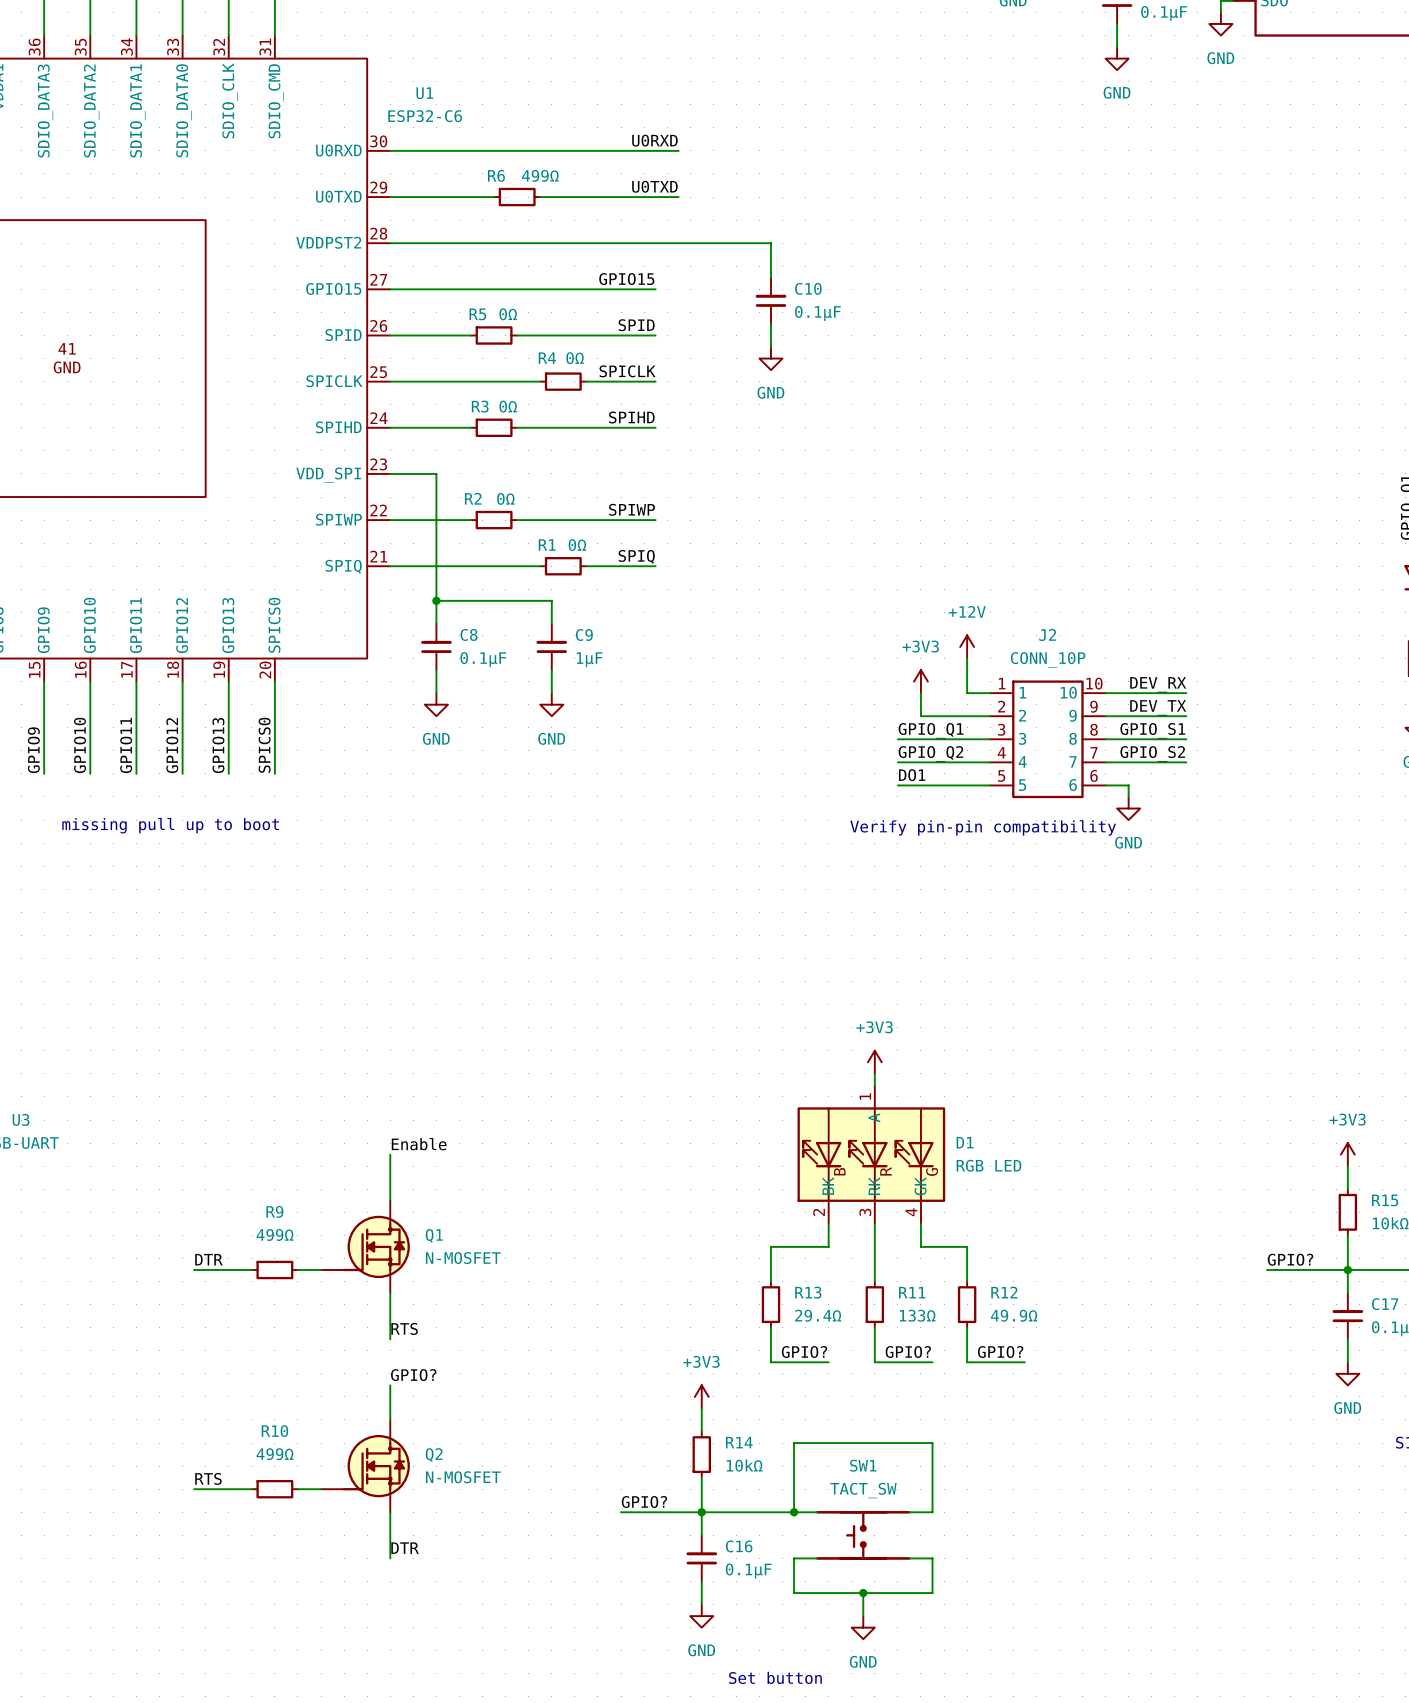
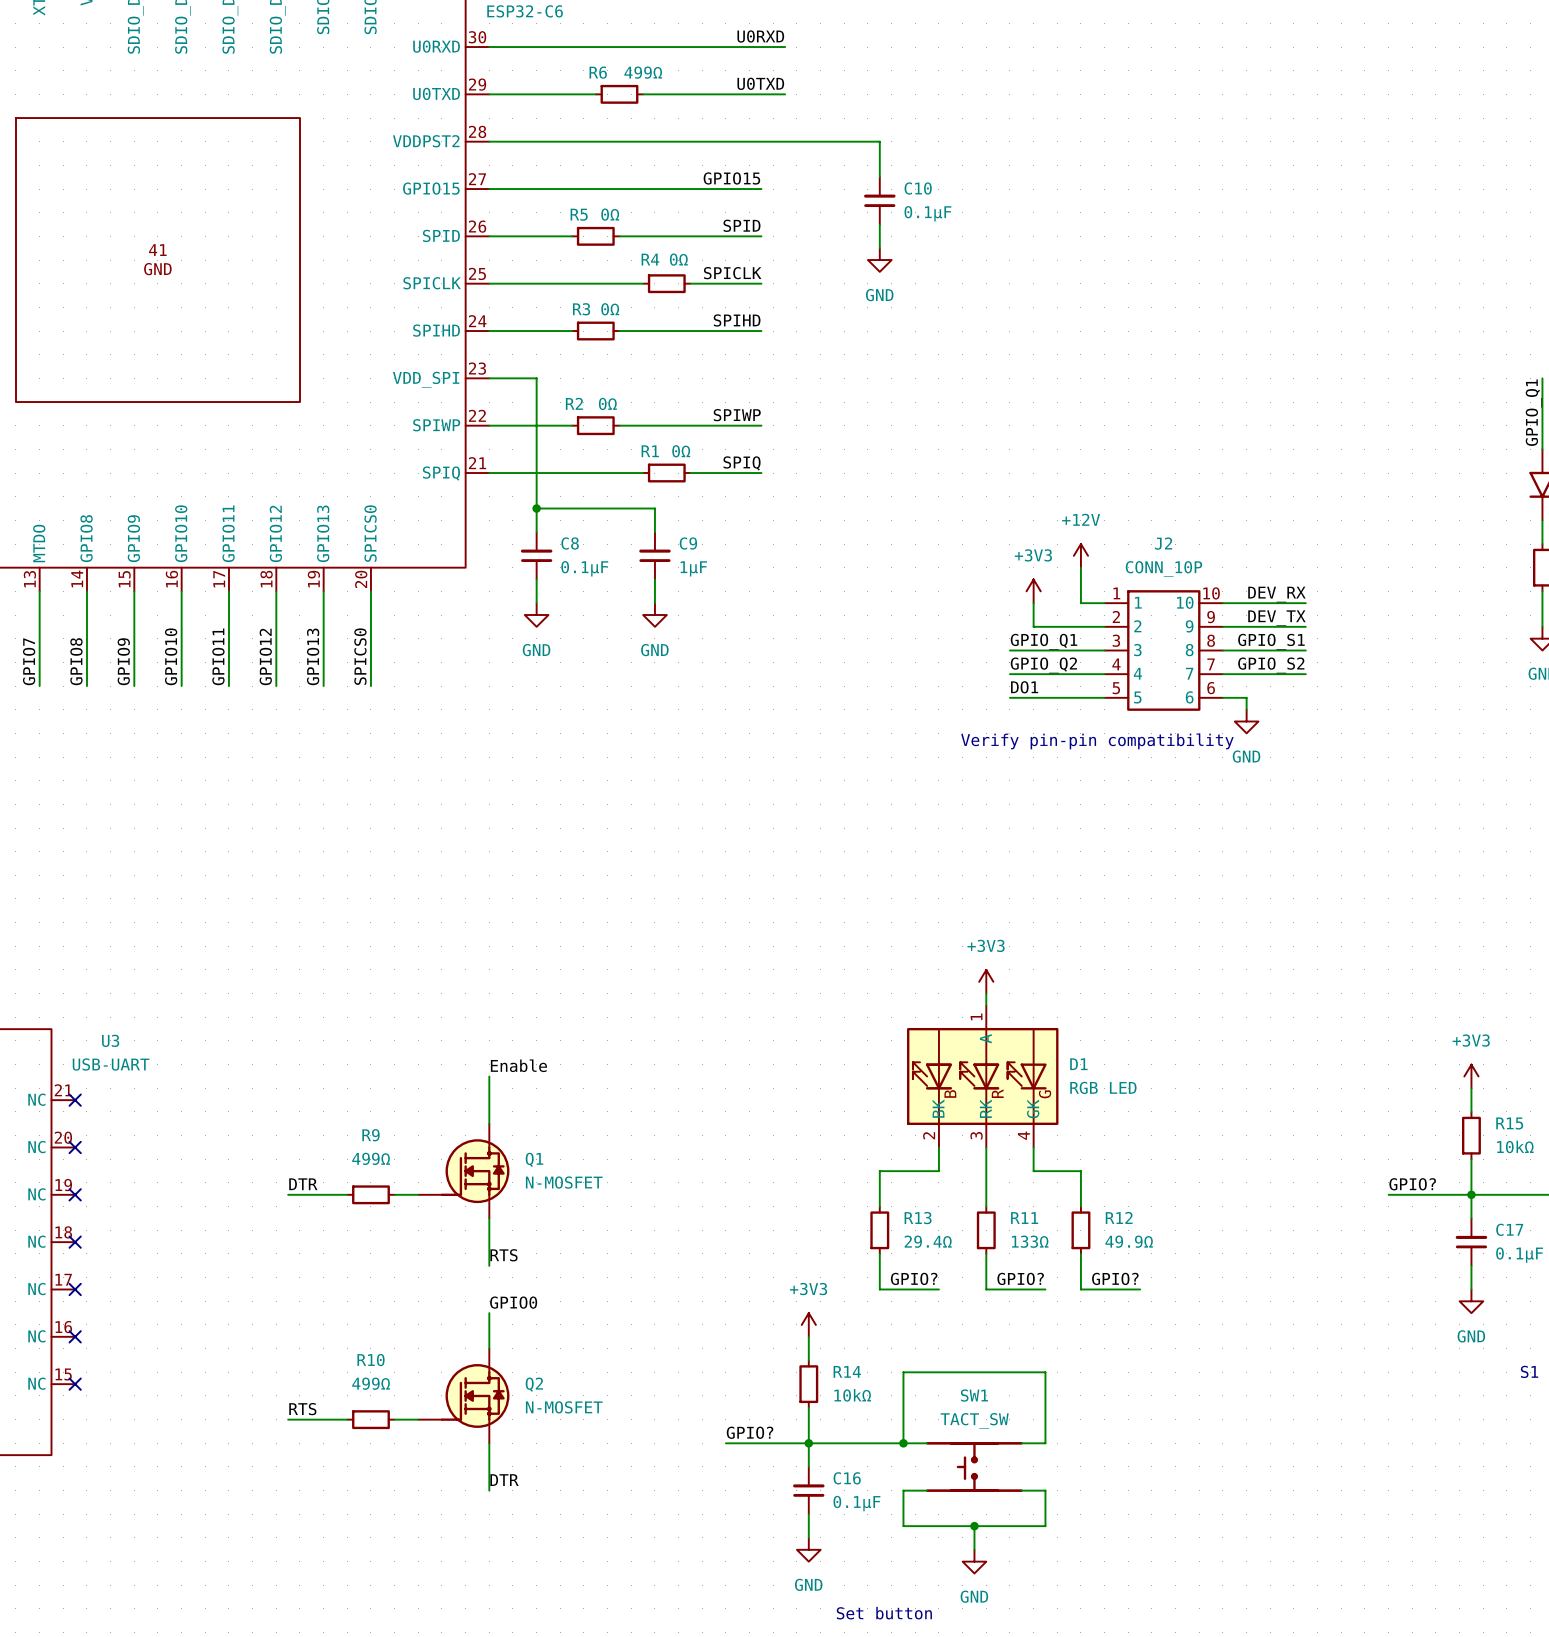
text: missing pull up to boot (170, 825) -> none
label: GPIO? (413, 1375) -> GPIO0 (513, 1302)

